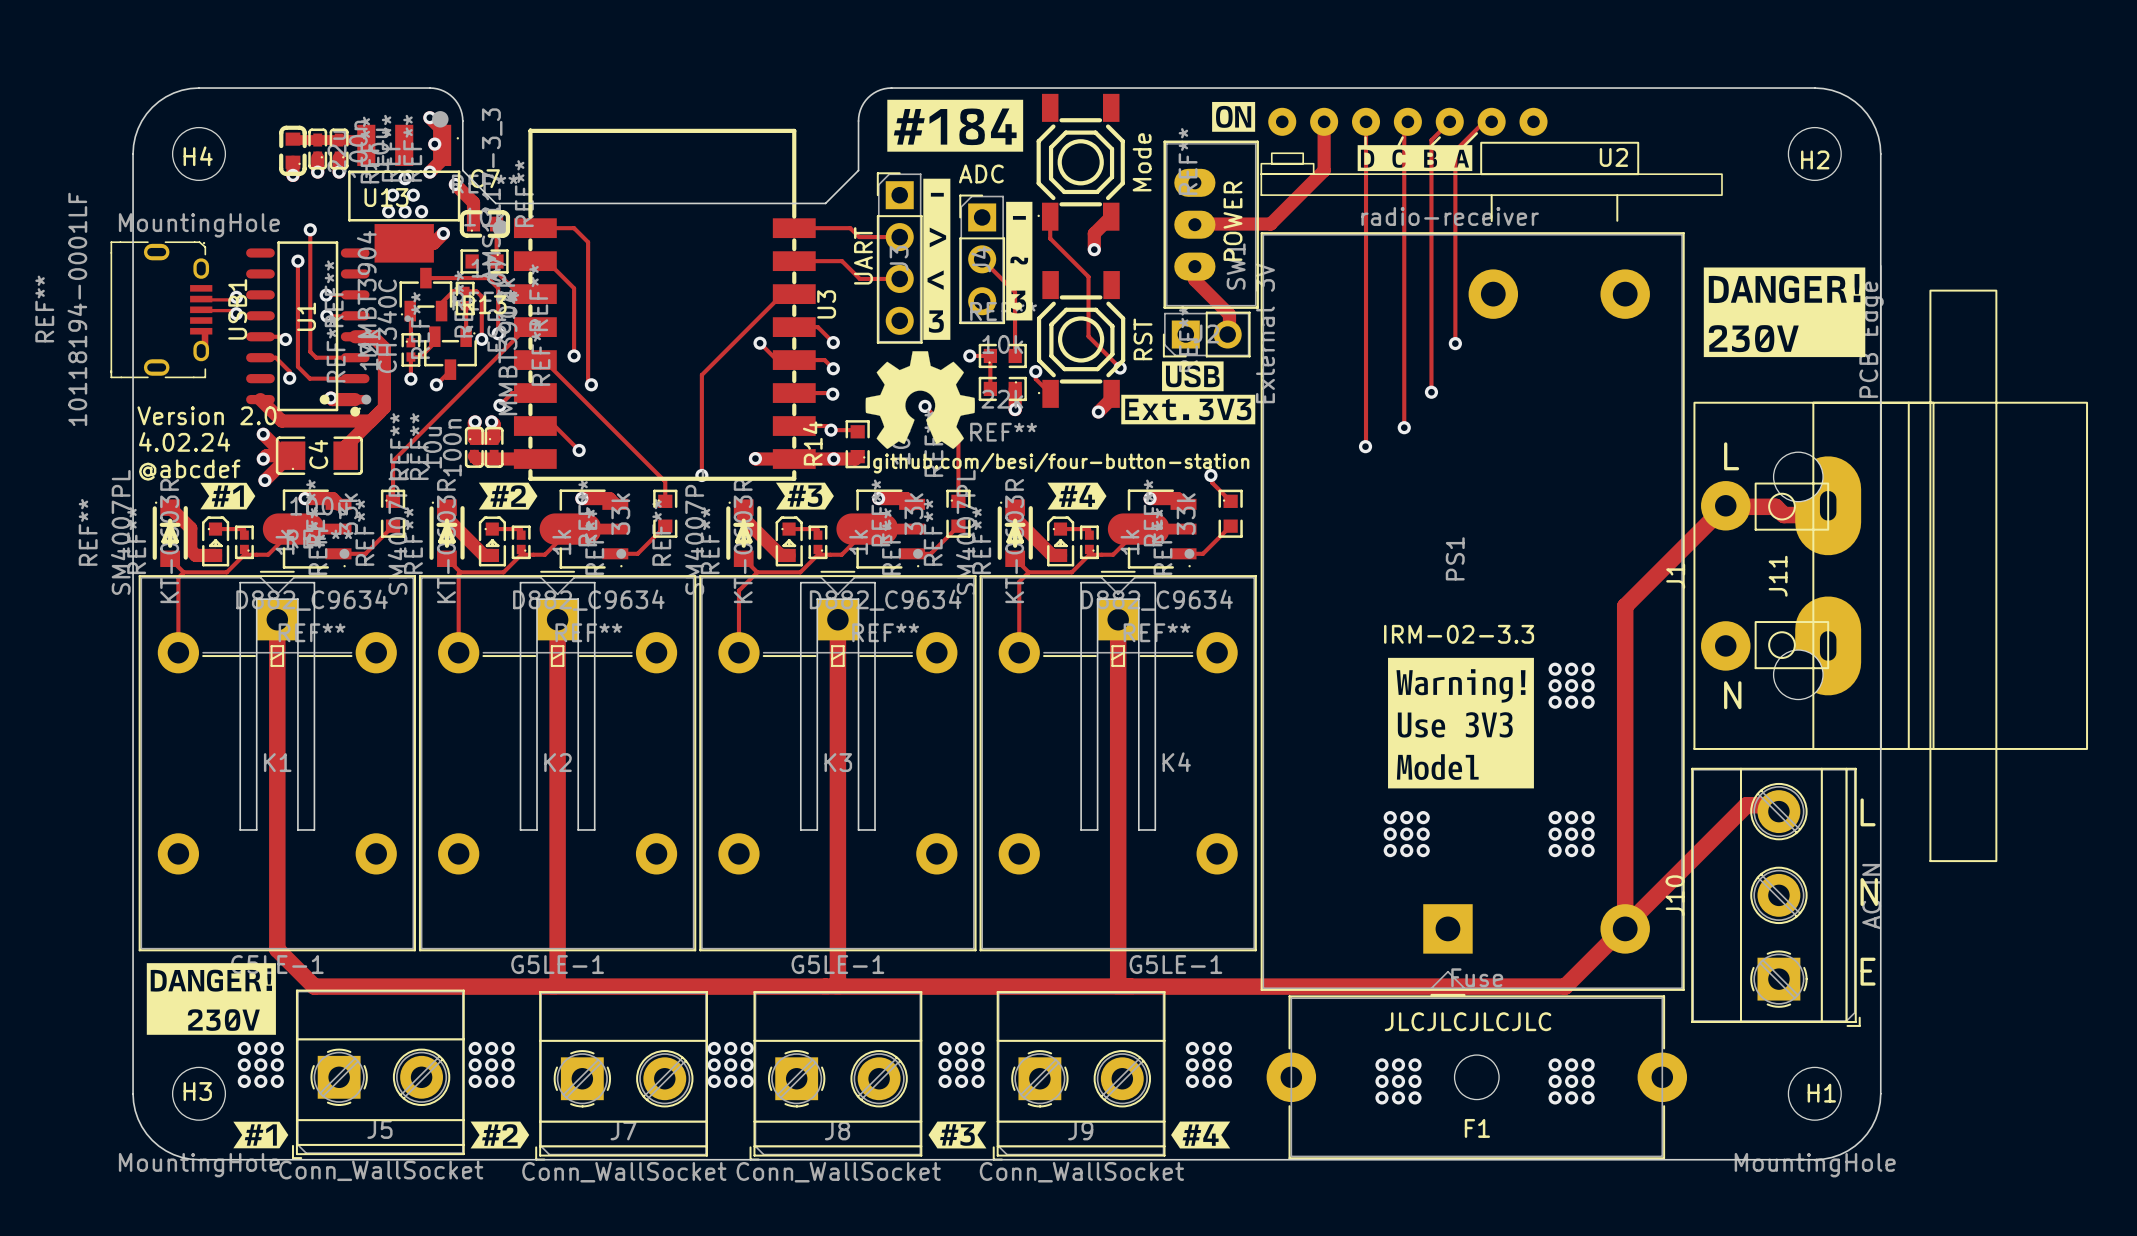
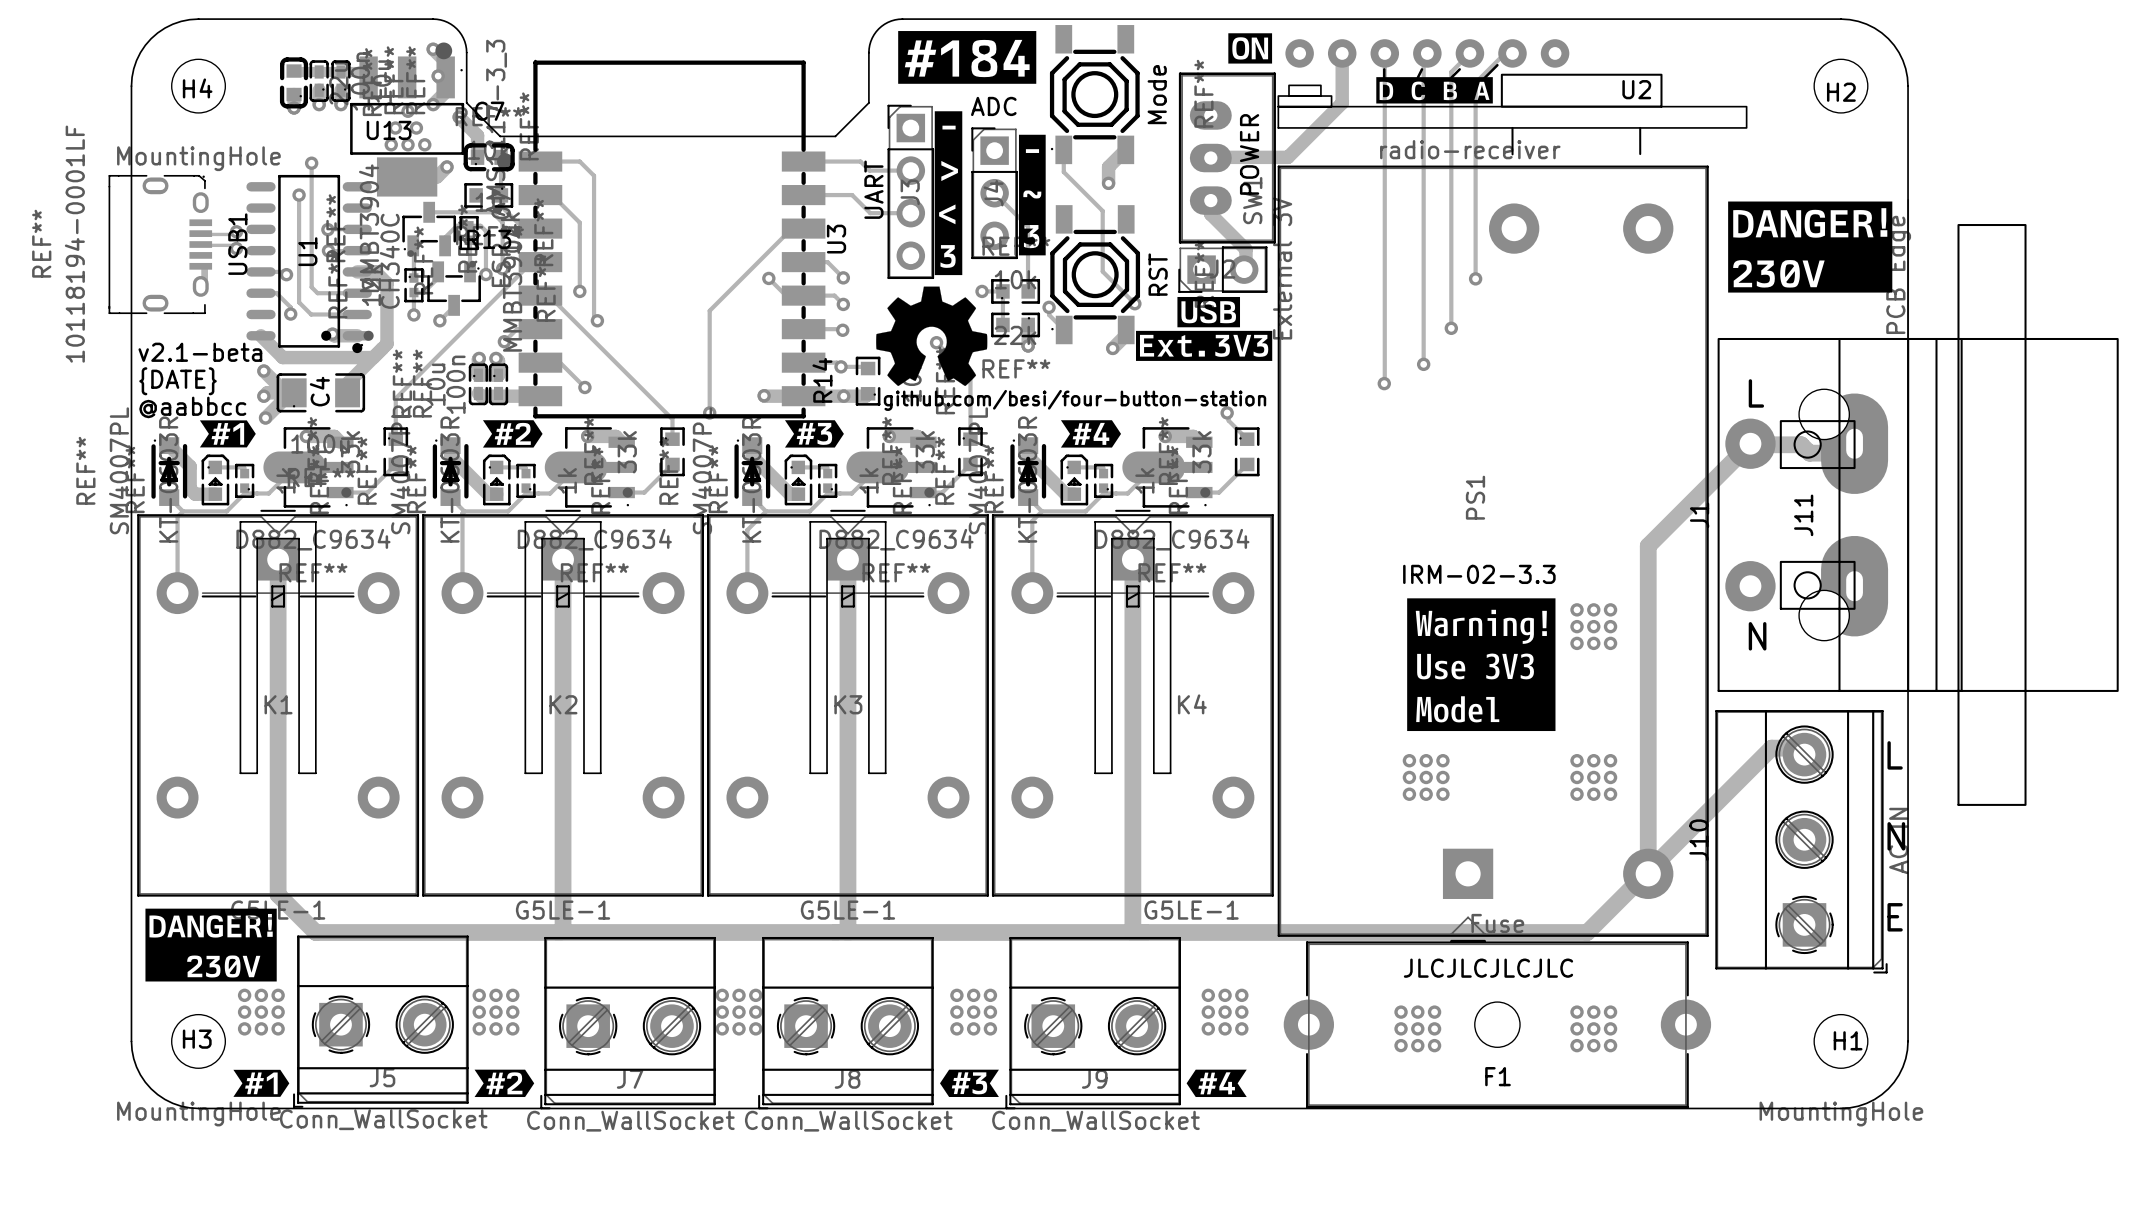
text: Version 2.0 (206, 415) -> v2.1-beta (200, 352)
text: 4.02.24 (184, 441) -> {DATE} (178, 381)
text: @abcdef (189, 470) -> @aabbcc (192, 407)

